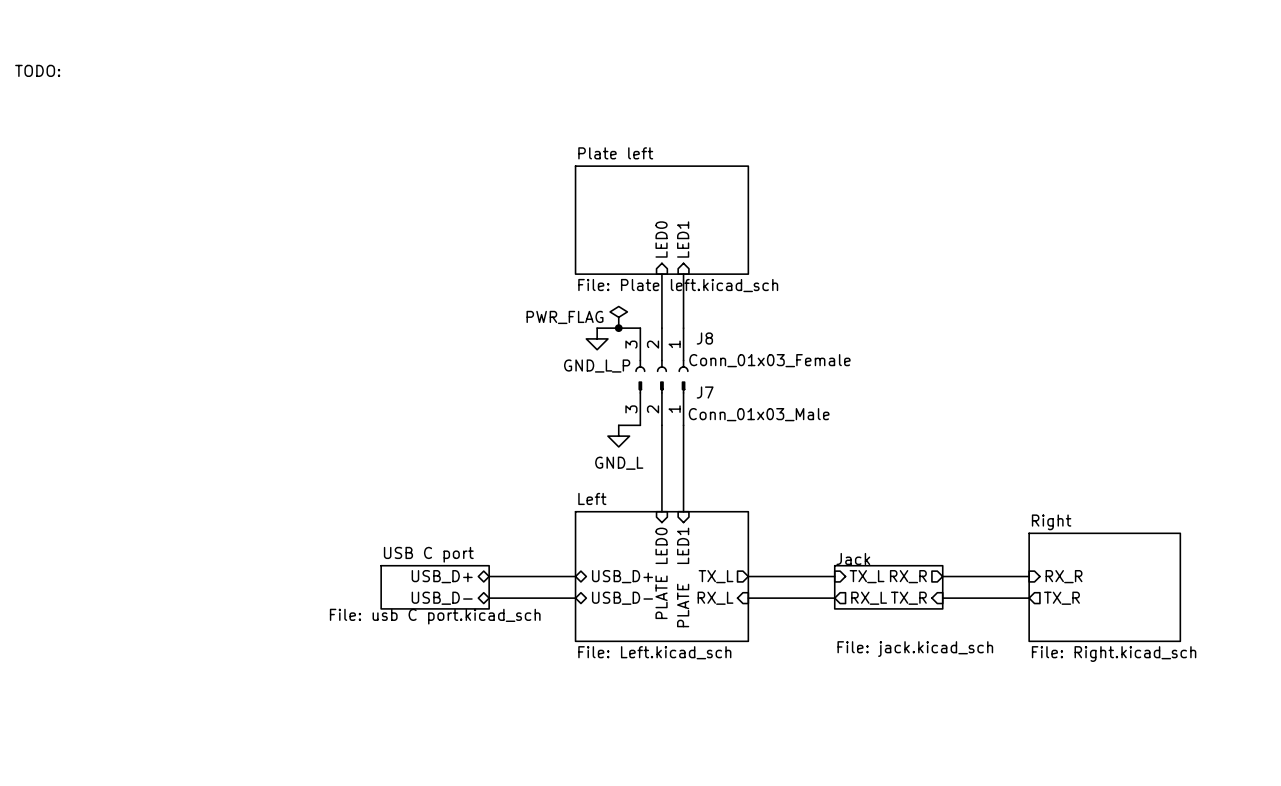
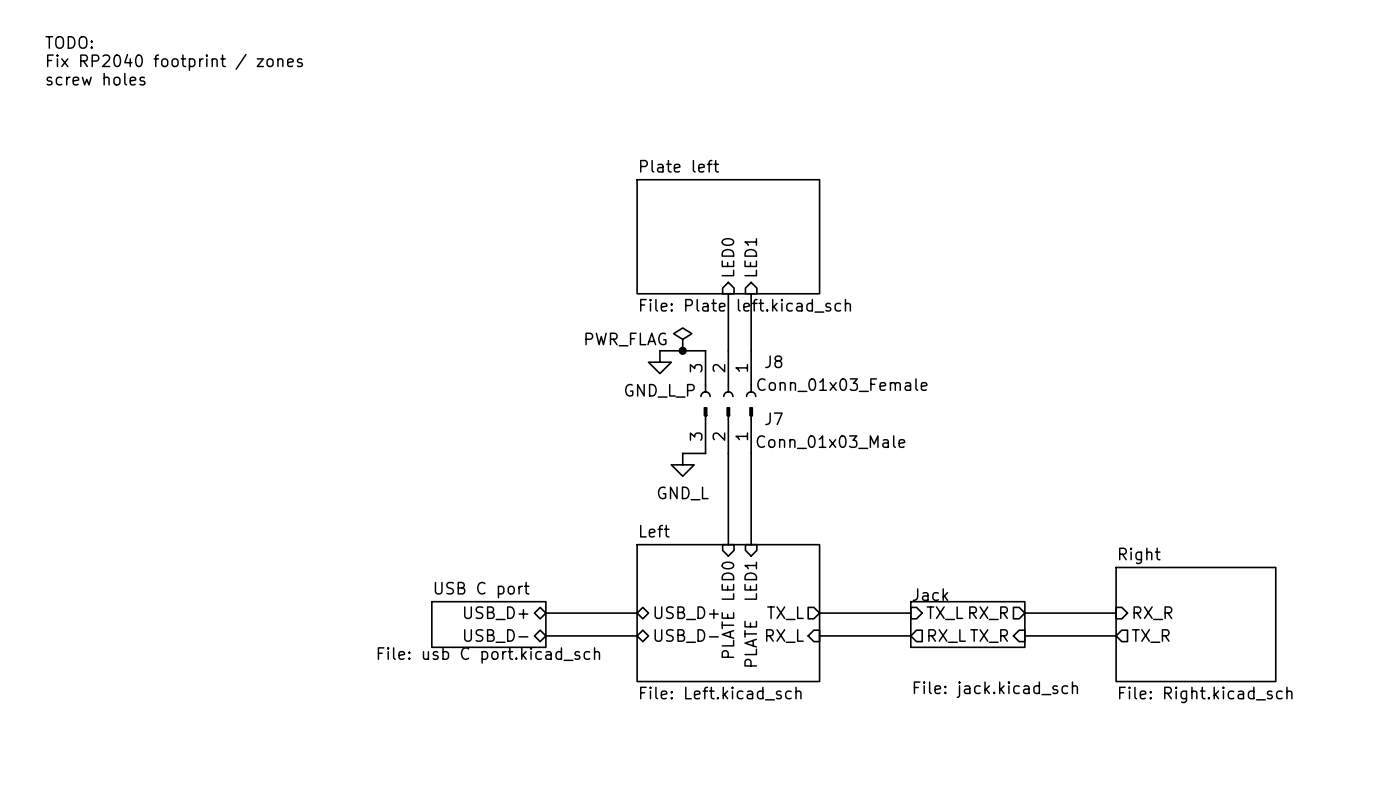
text: none -> TODO: (69, 42)
text: none -> Fix RP2040 footprint / zones (175, 62)
text: TODO: (37, 70) -> screw holes (96, 79)

